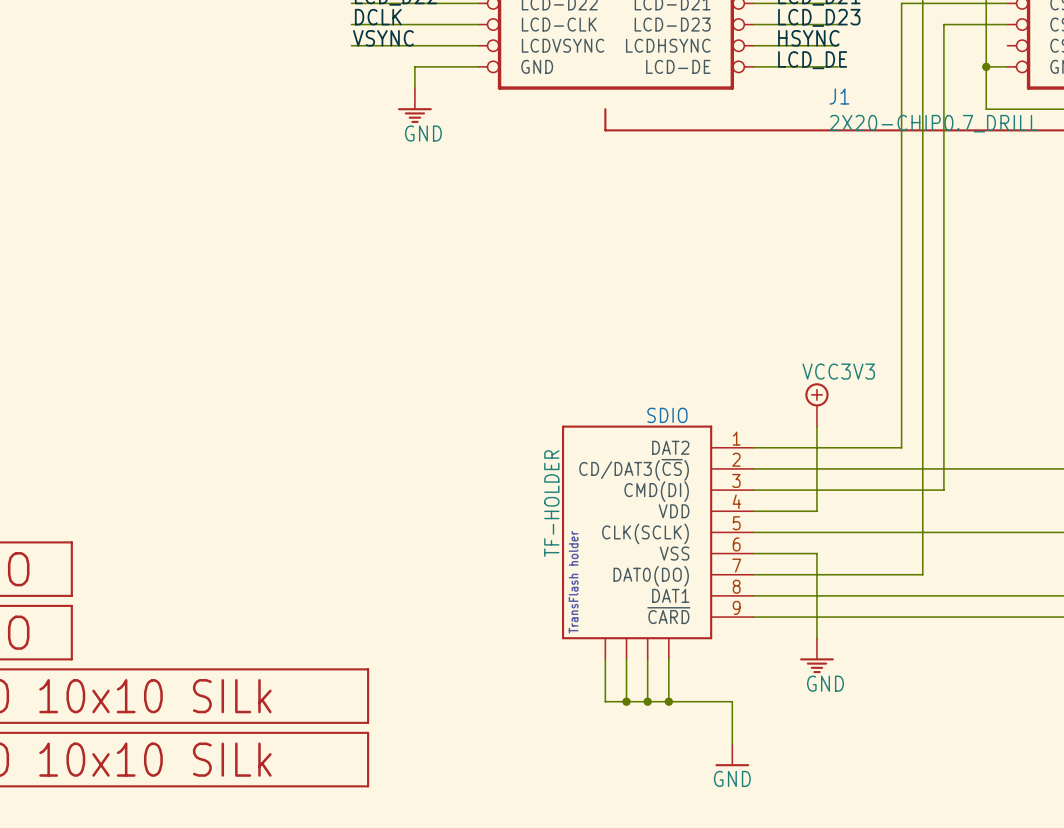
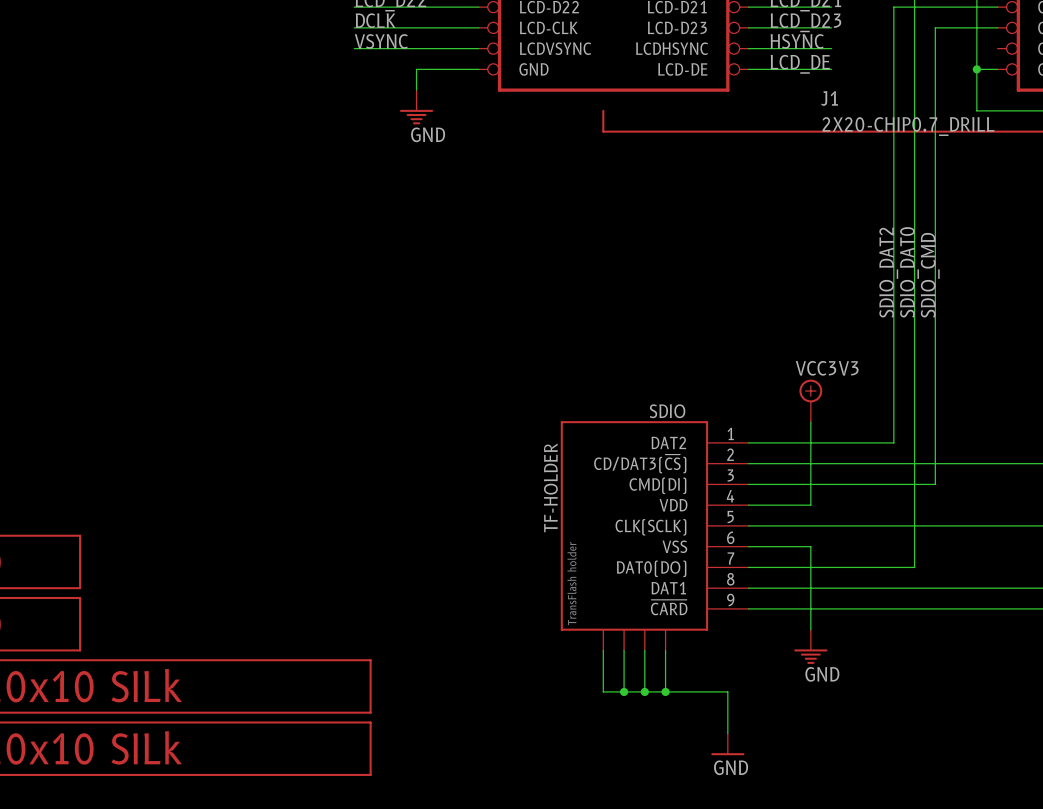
label: none -> SDIO_DAT2 (888, 272)
label: none -> SDIO_DAT0 (909, 272)
label: none -> SDIO_CMD (930, 275)

